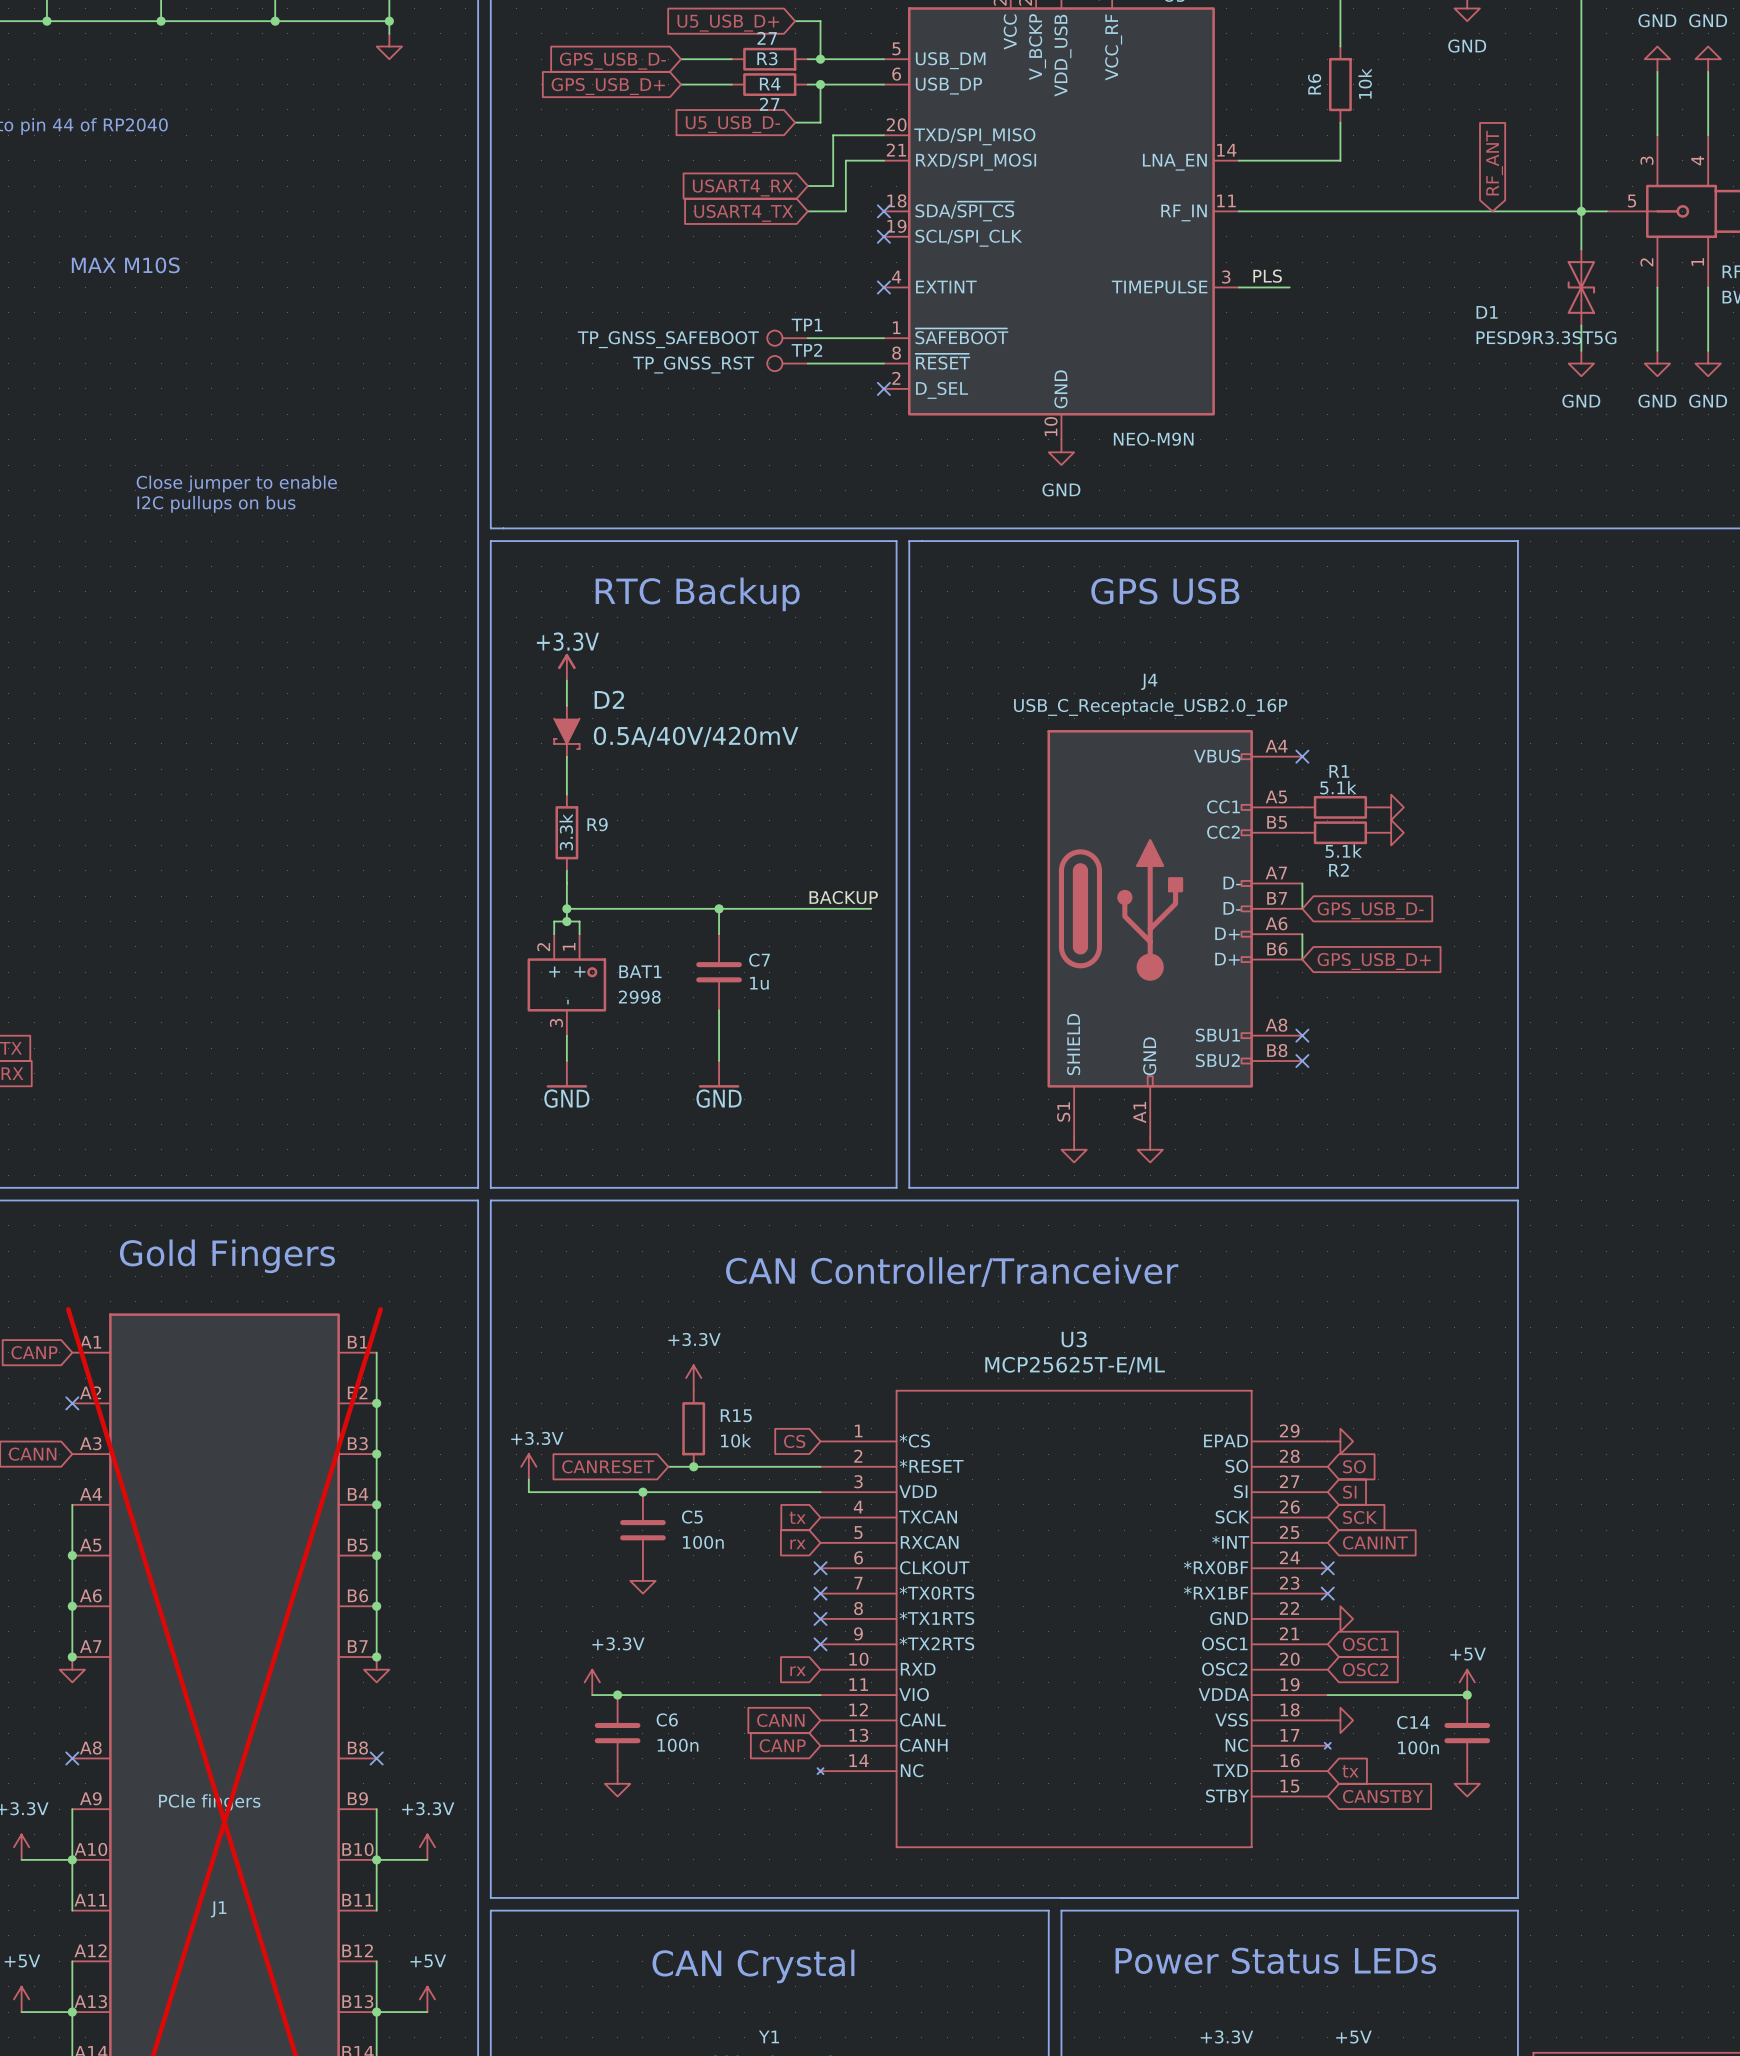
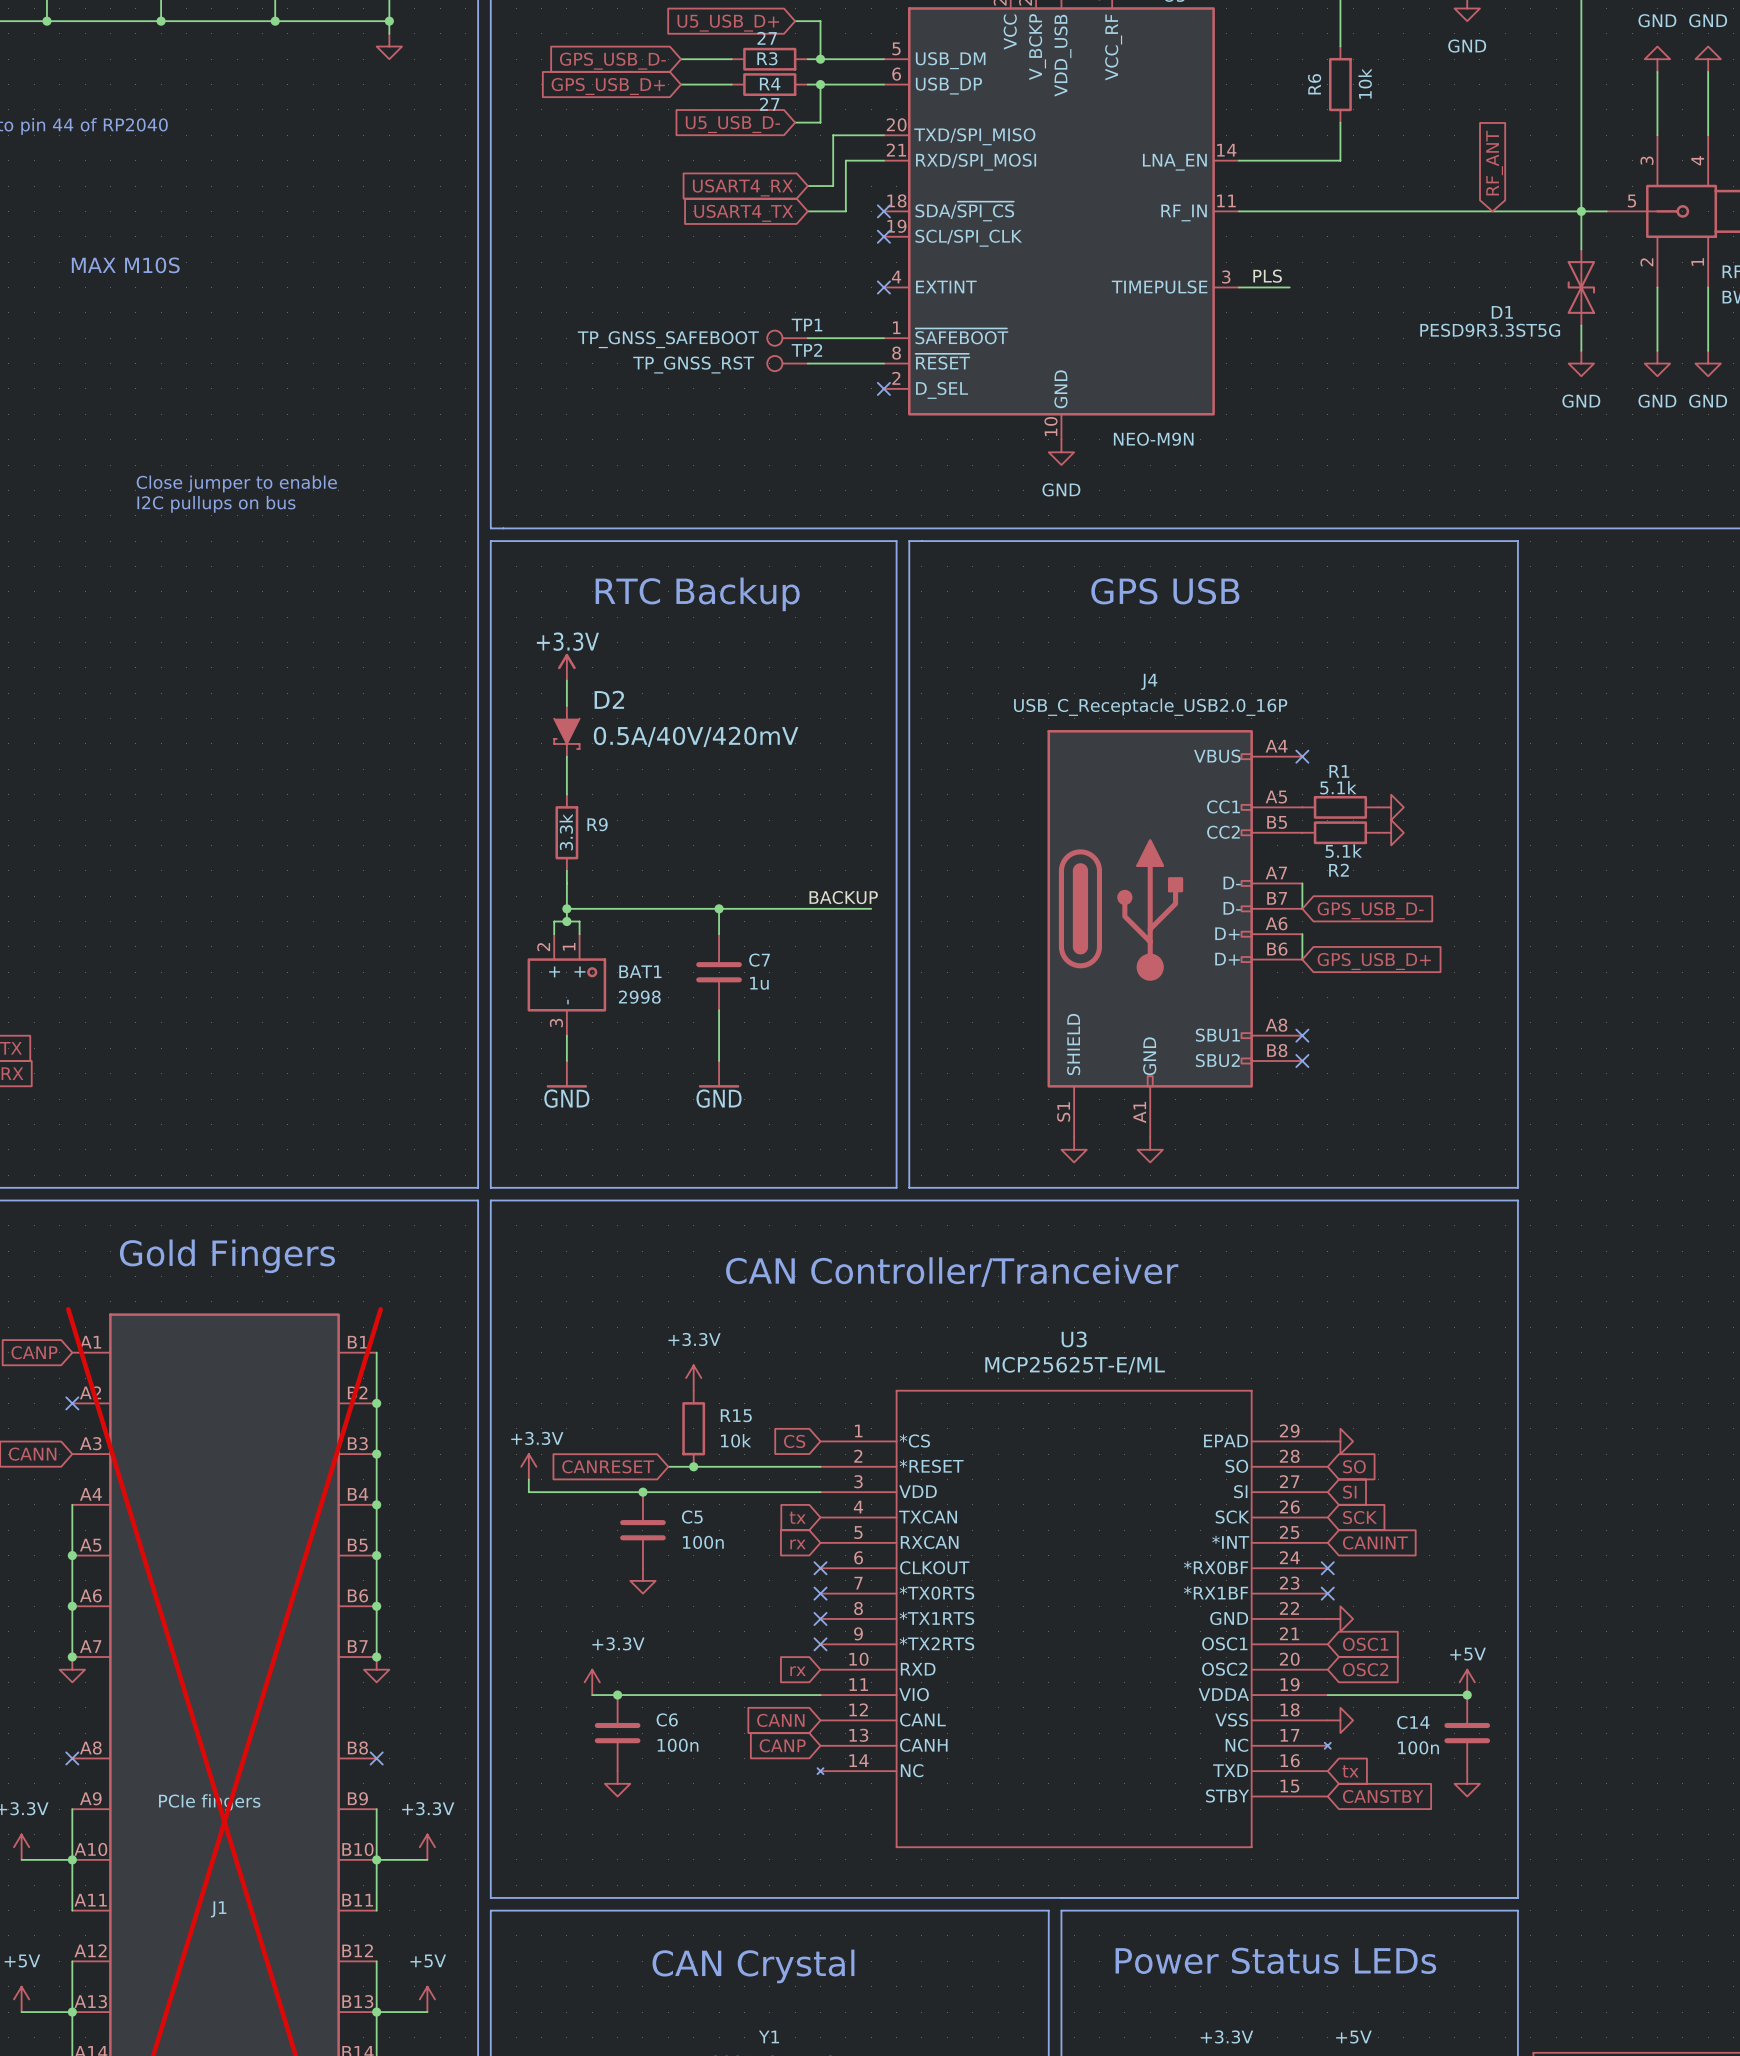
D1 name position: D1 (1487, 312) -> D1 (1502, 312)
D1 value position: PESD9R3.3ST5G (1546, 337) -> PESD9R3.3ST5G (1490, 330)

